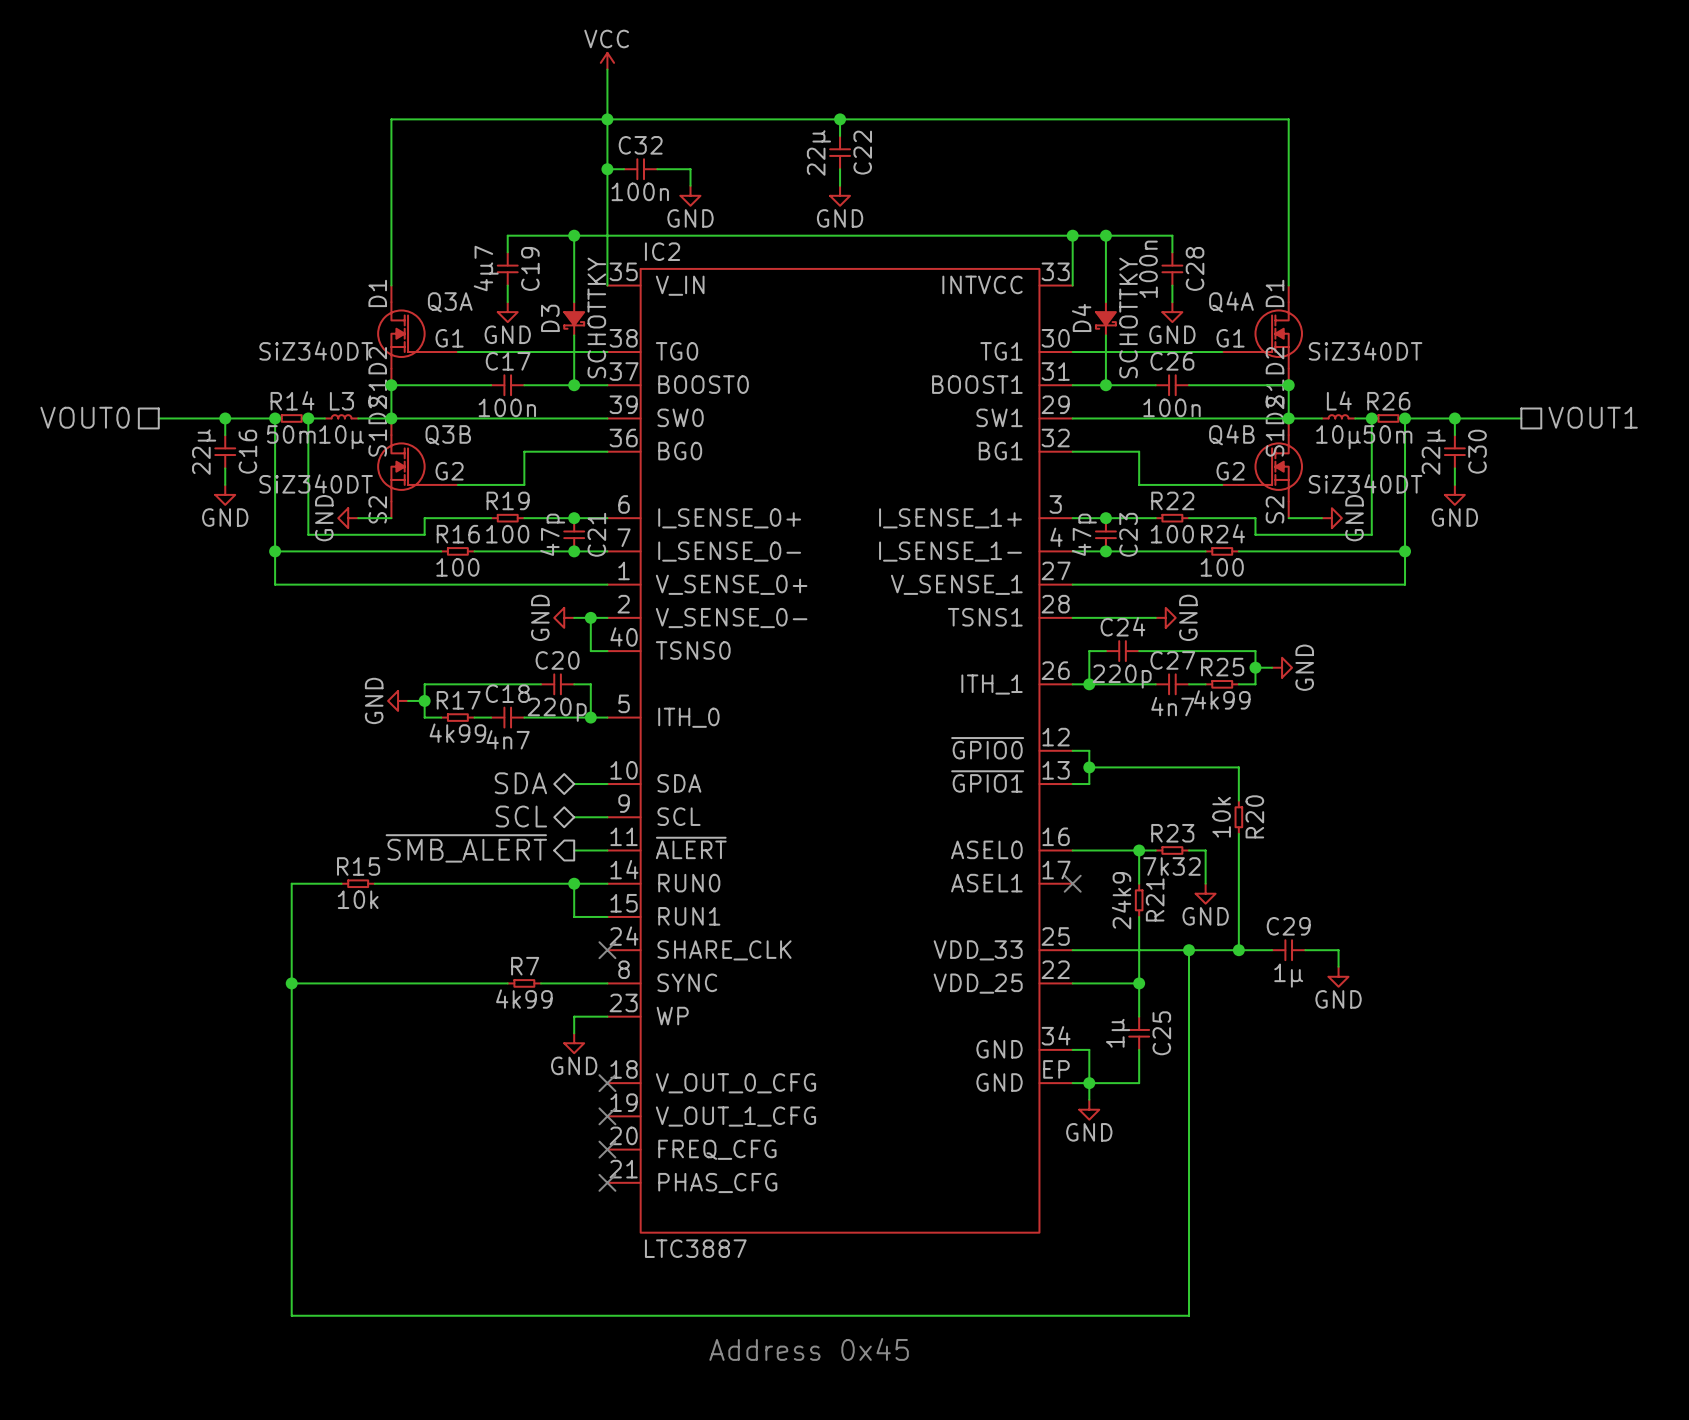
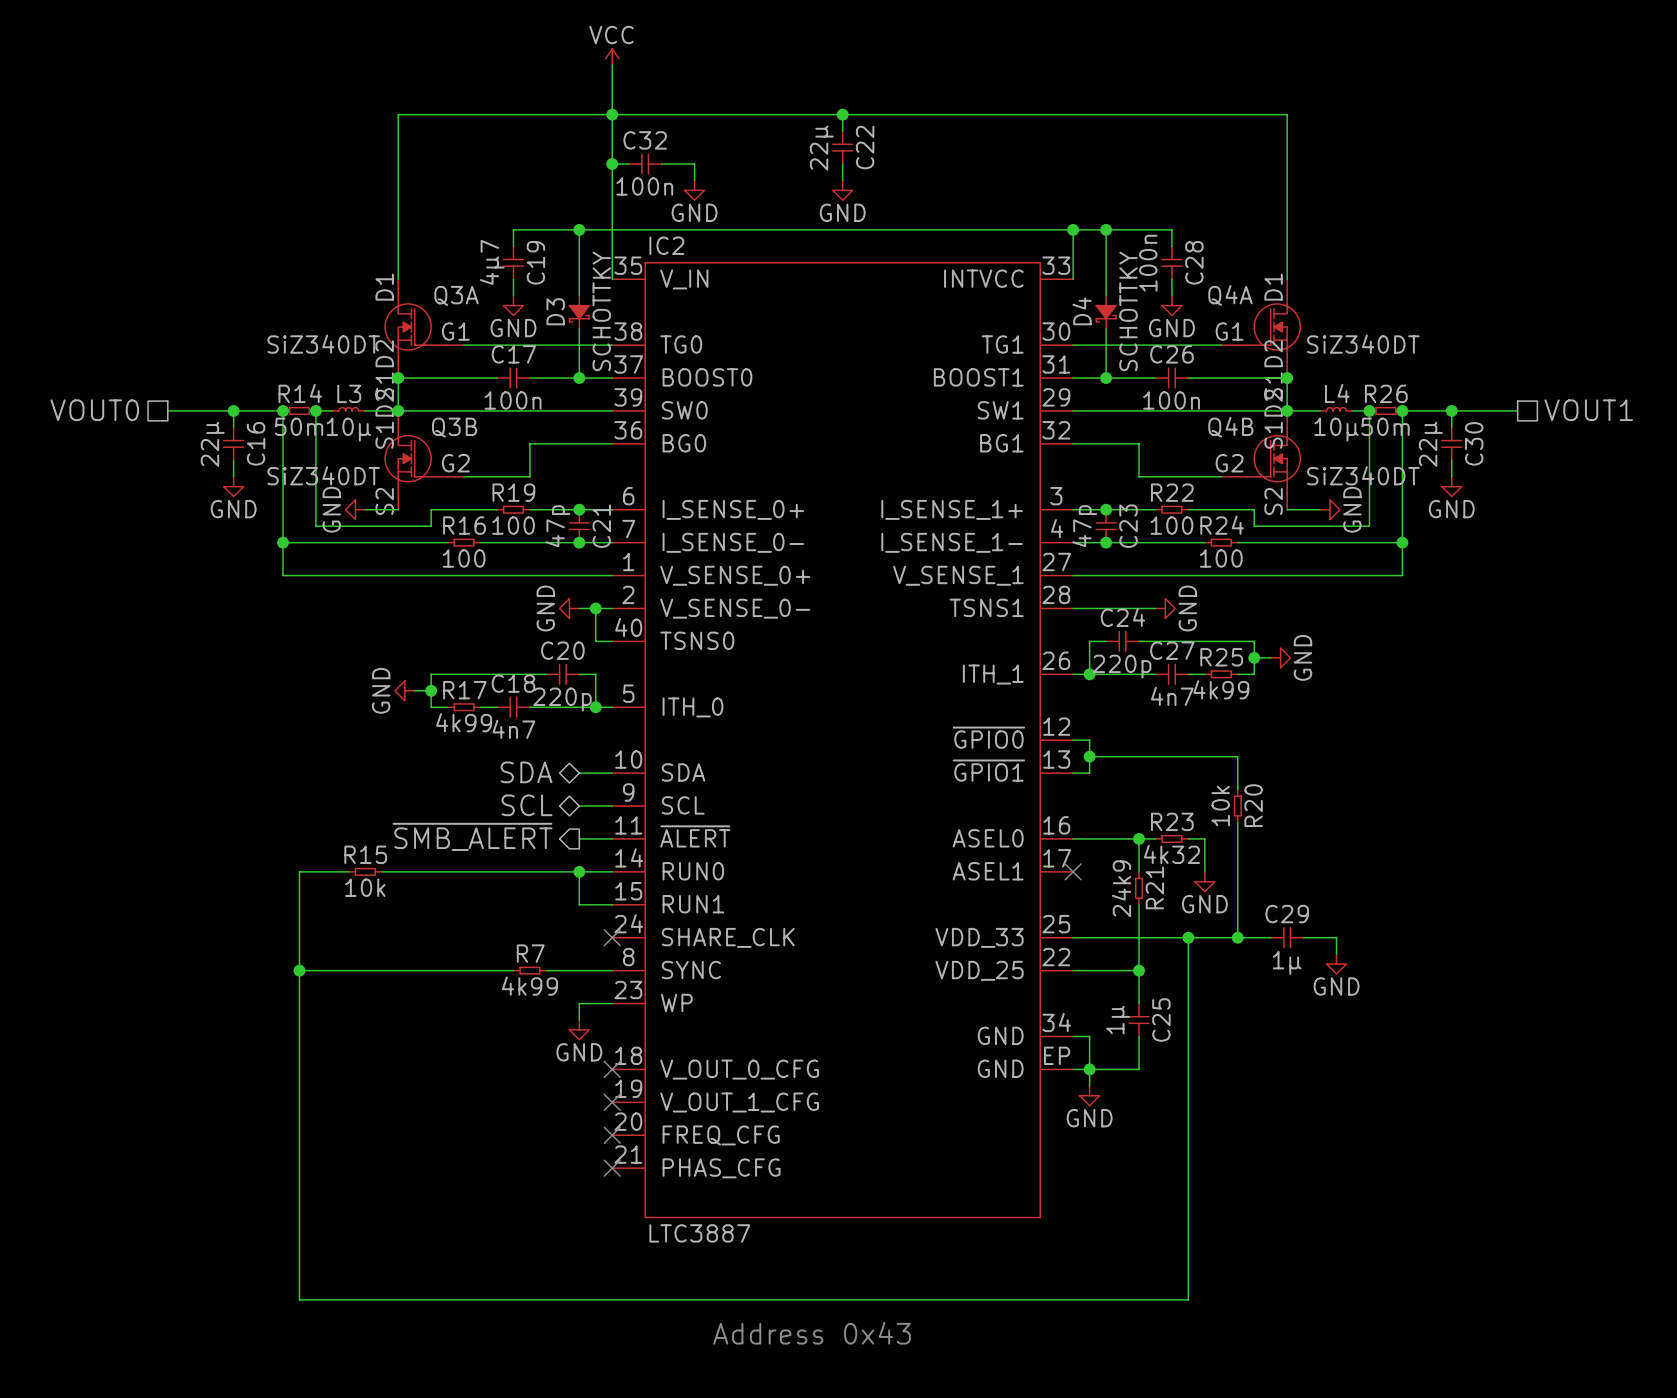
R23 value: 7k32 (1171, 866) -> 4k32 (1171, 854)
text: Address 0x45 (809, 1349) -> Address 0x43 (812, 1333)

